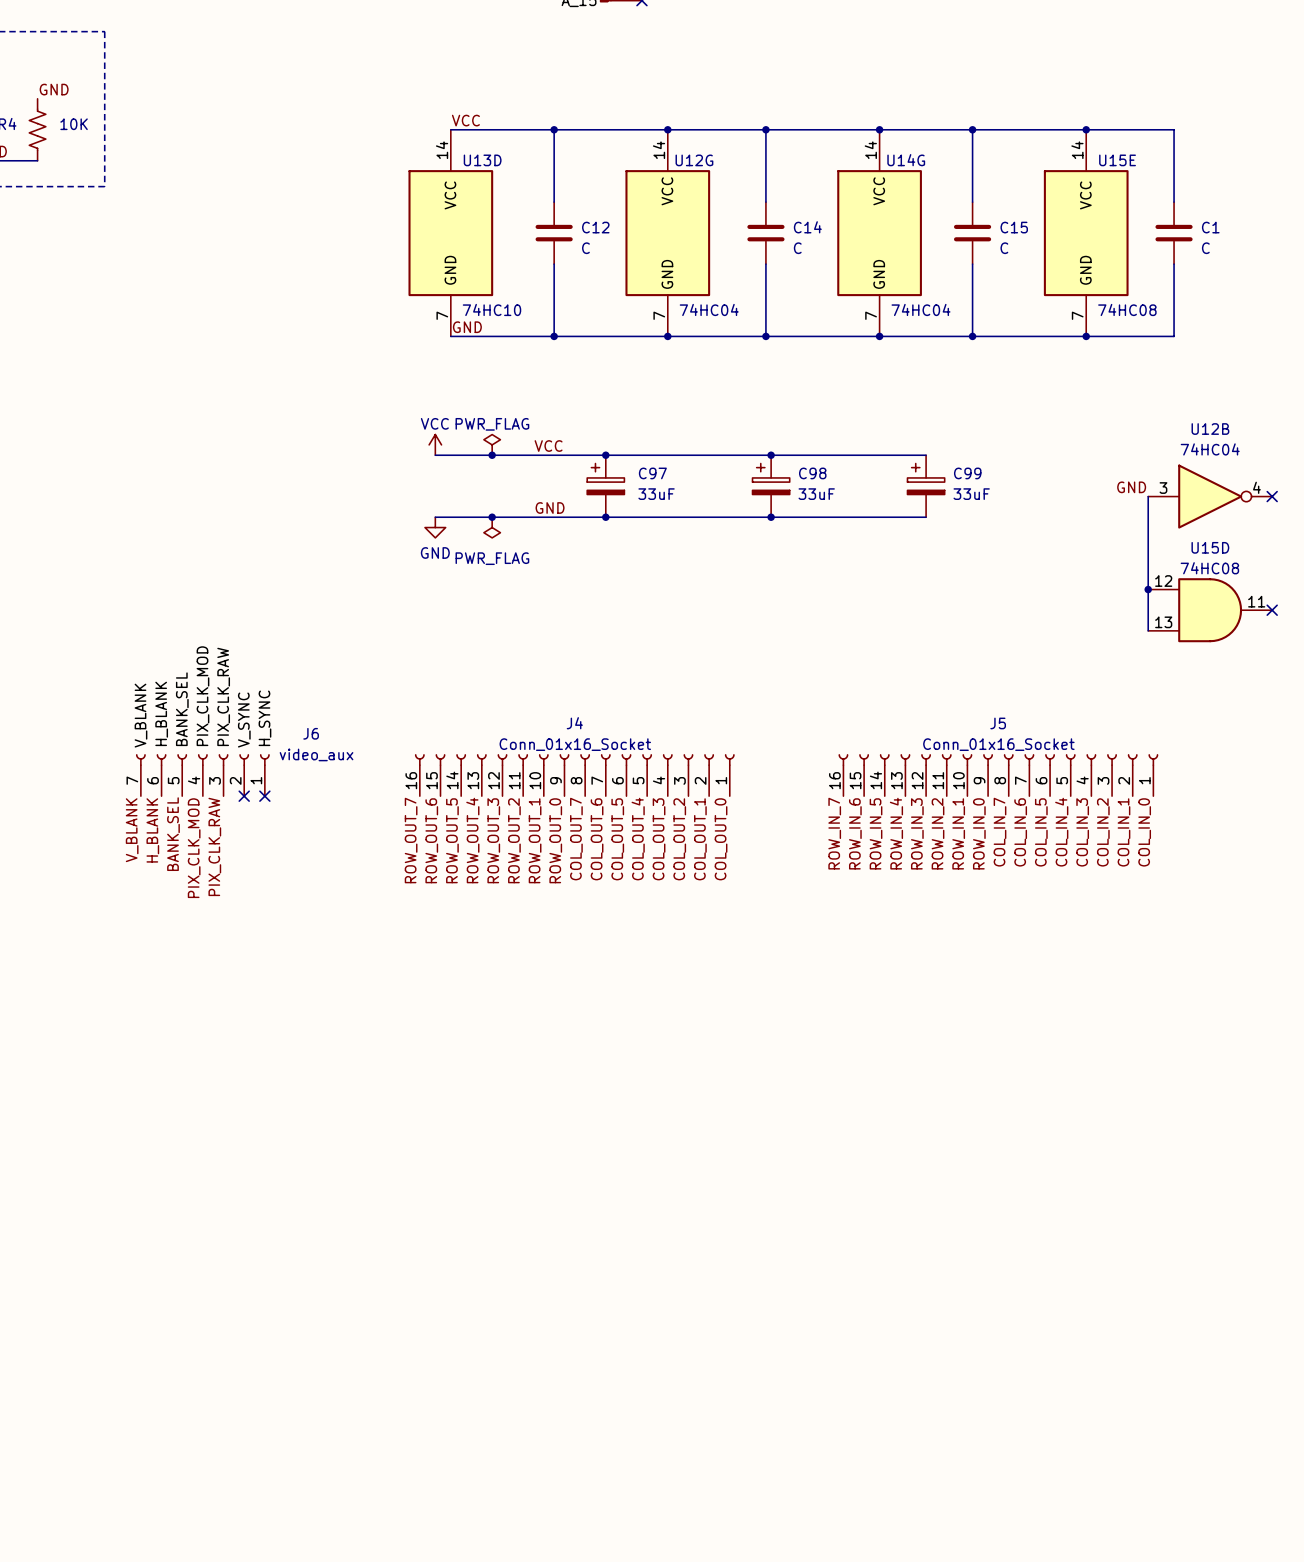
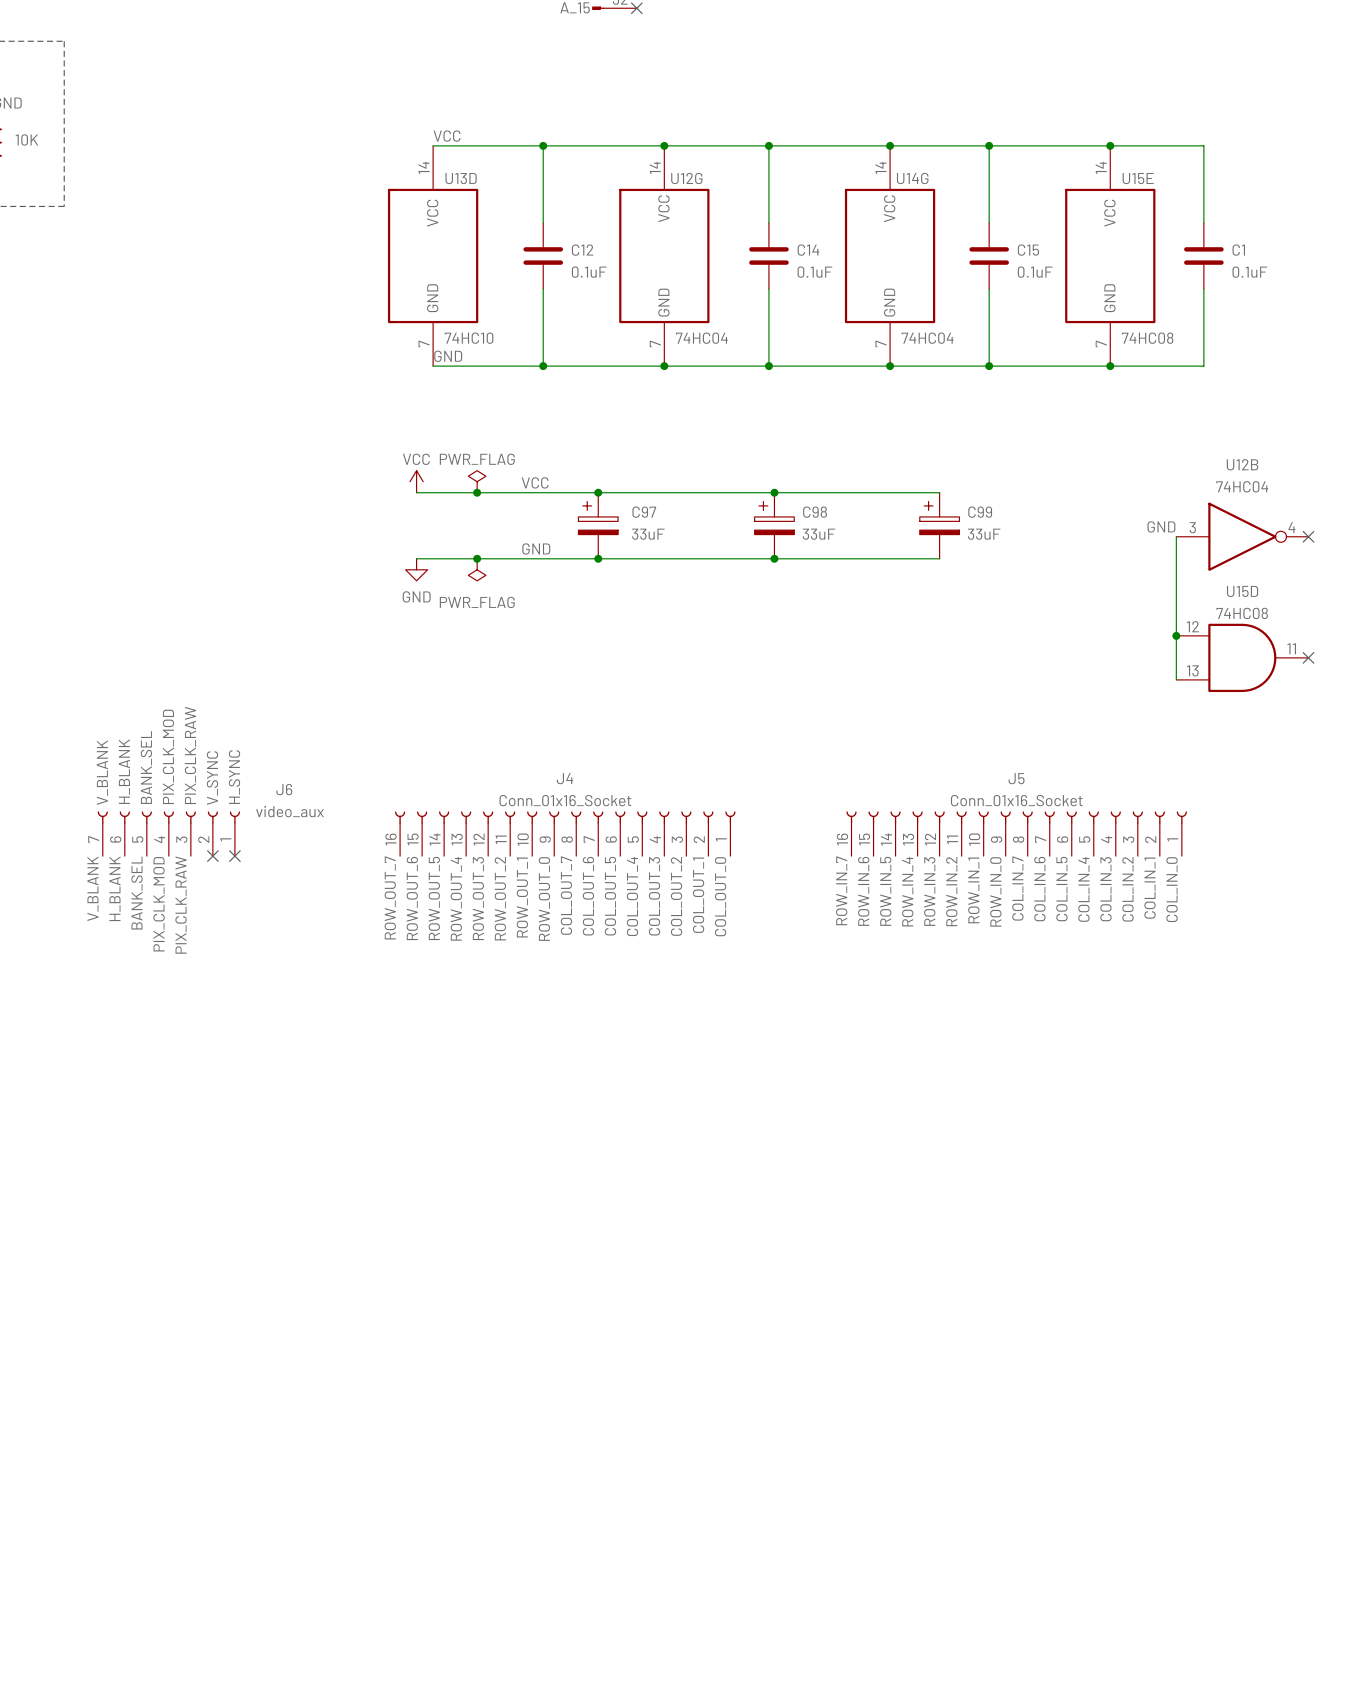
C12 value: C (585, 248) -> 0.1uF (589, 272)
C14 value: C (797, 248) -> 0.1uF (814, 272)
C15 value: C (1004, 248) -> 0.1uF (1035, 272)
C1 value: C (1205, 248) -> 0.1uF (1249, 272)

